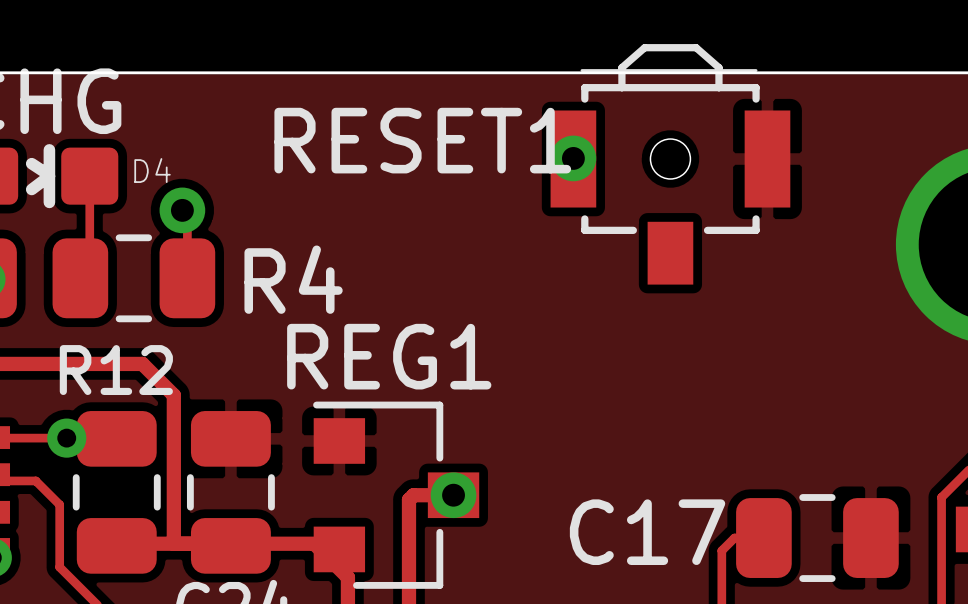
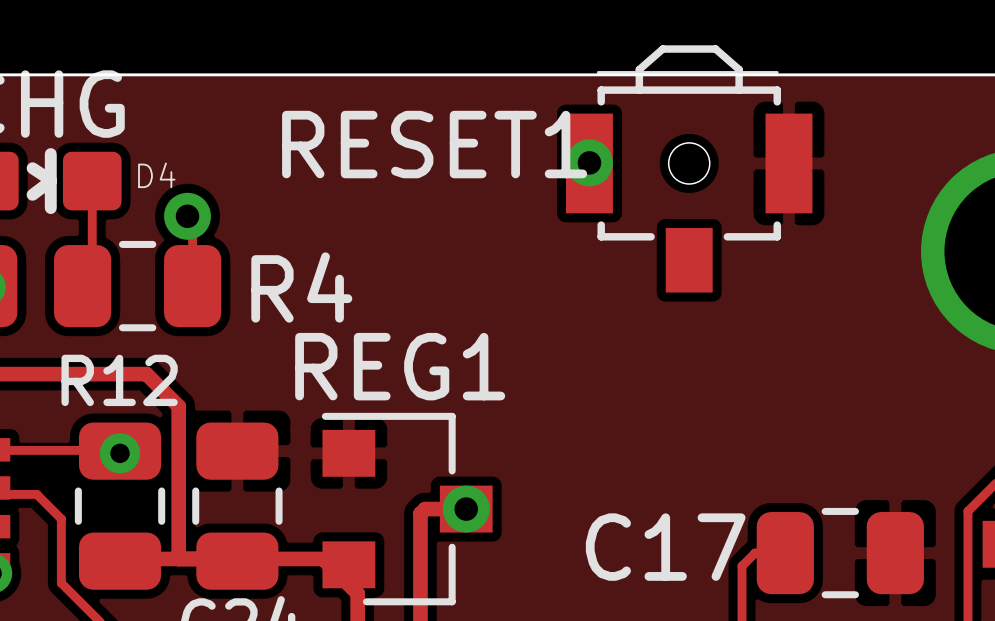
via position: (66, 438) -> (120, 453)

